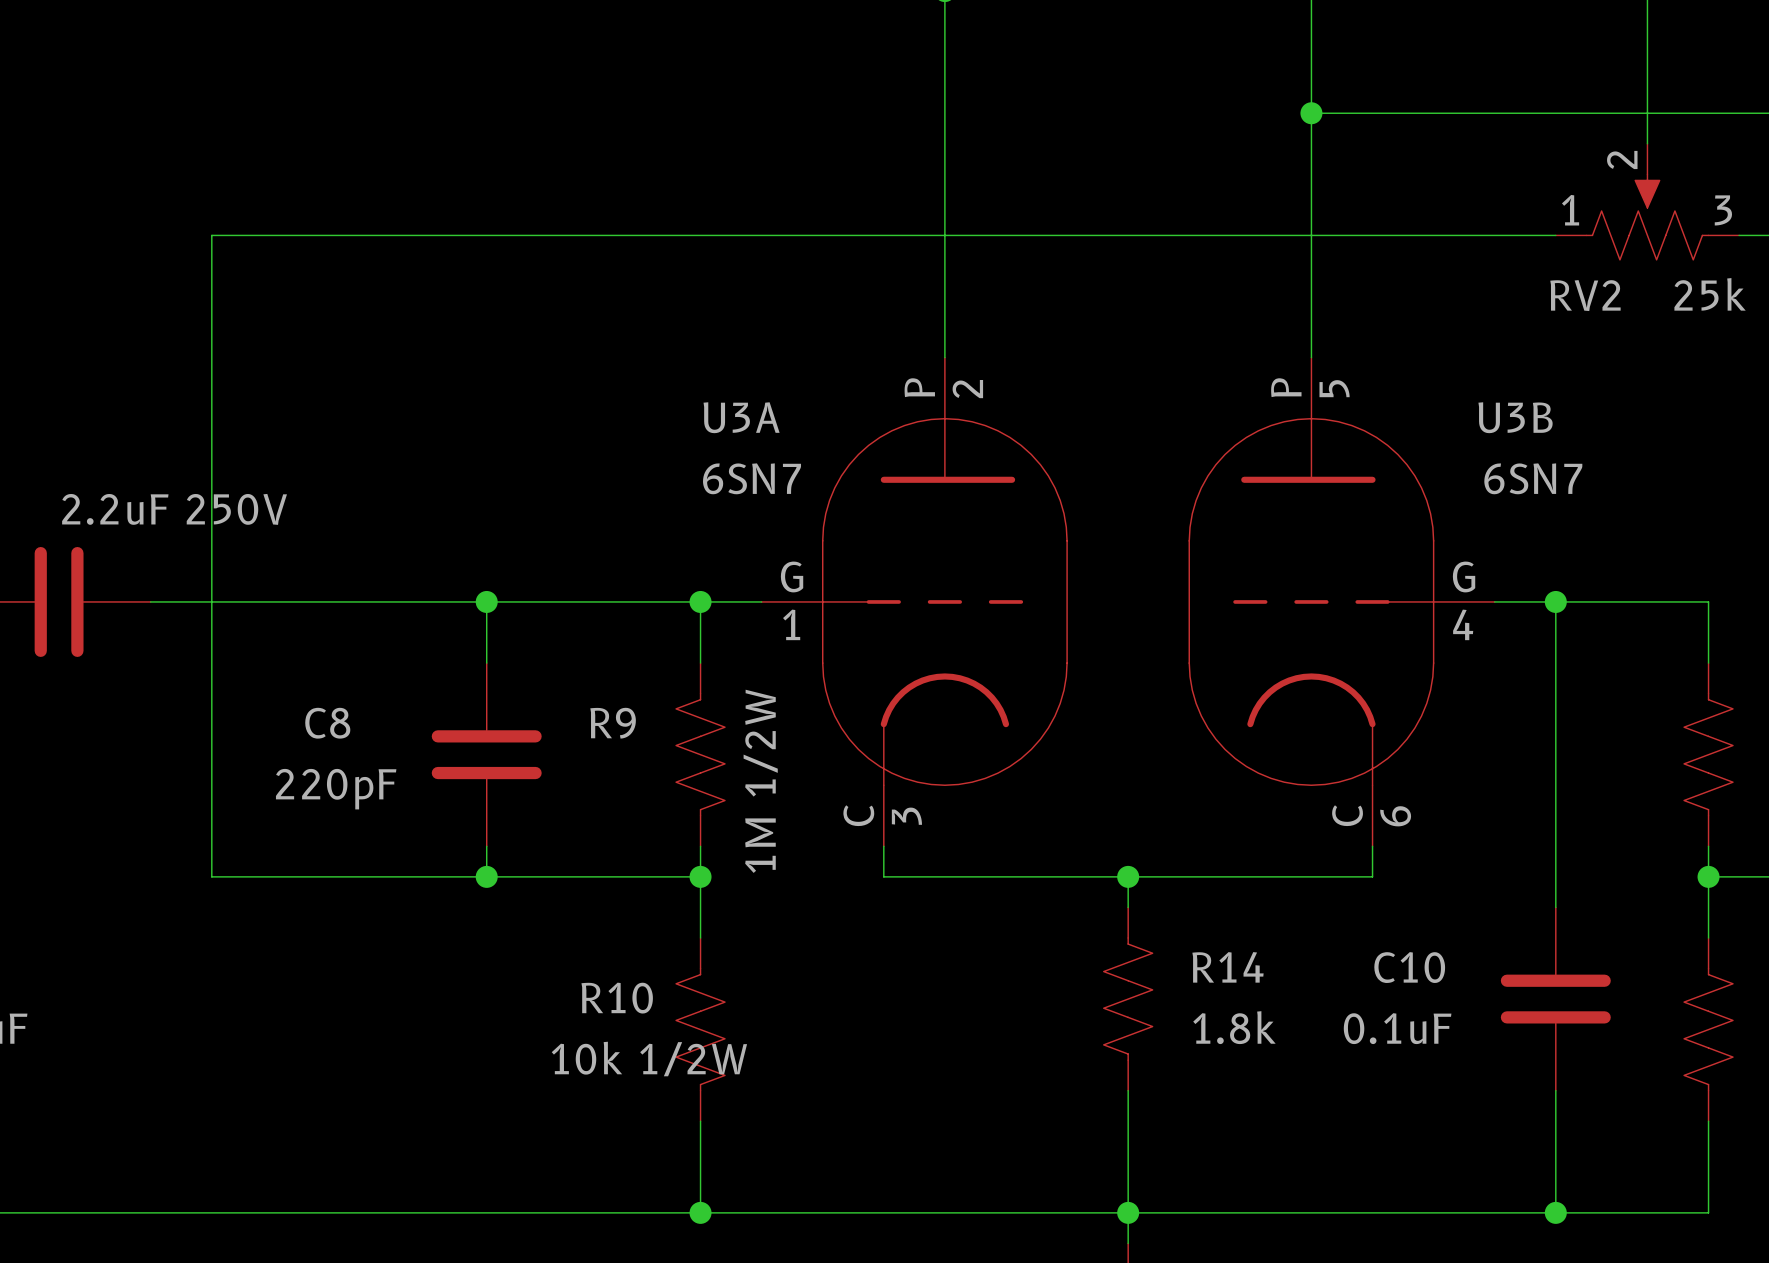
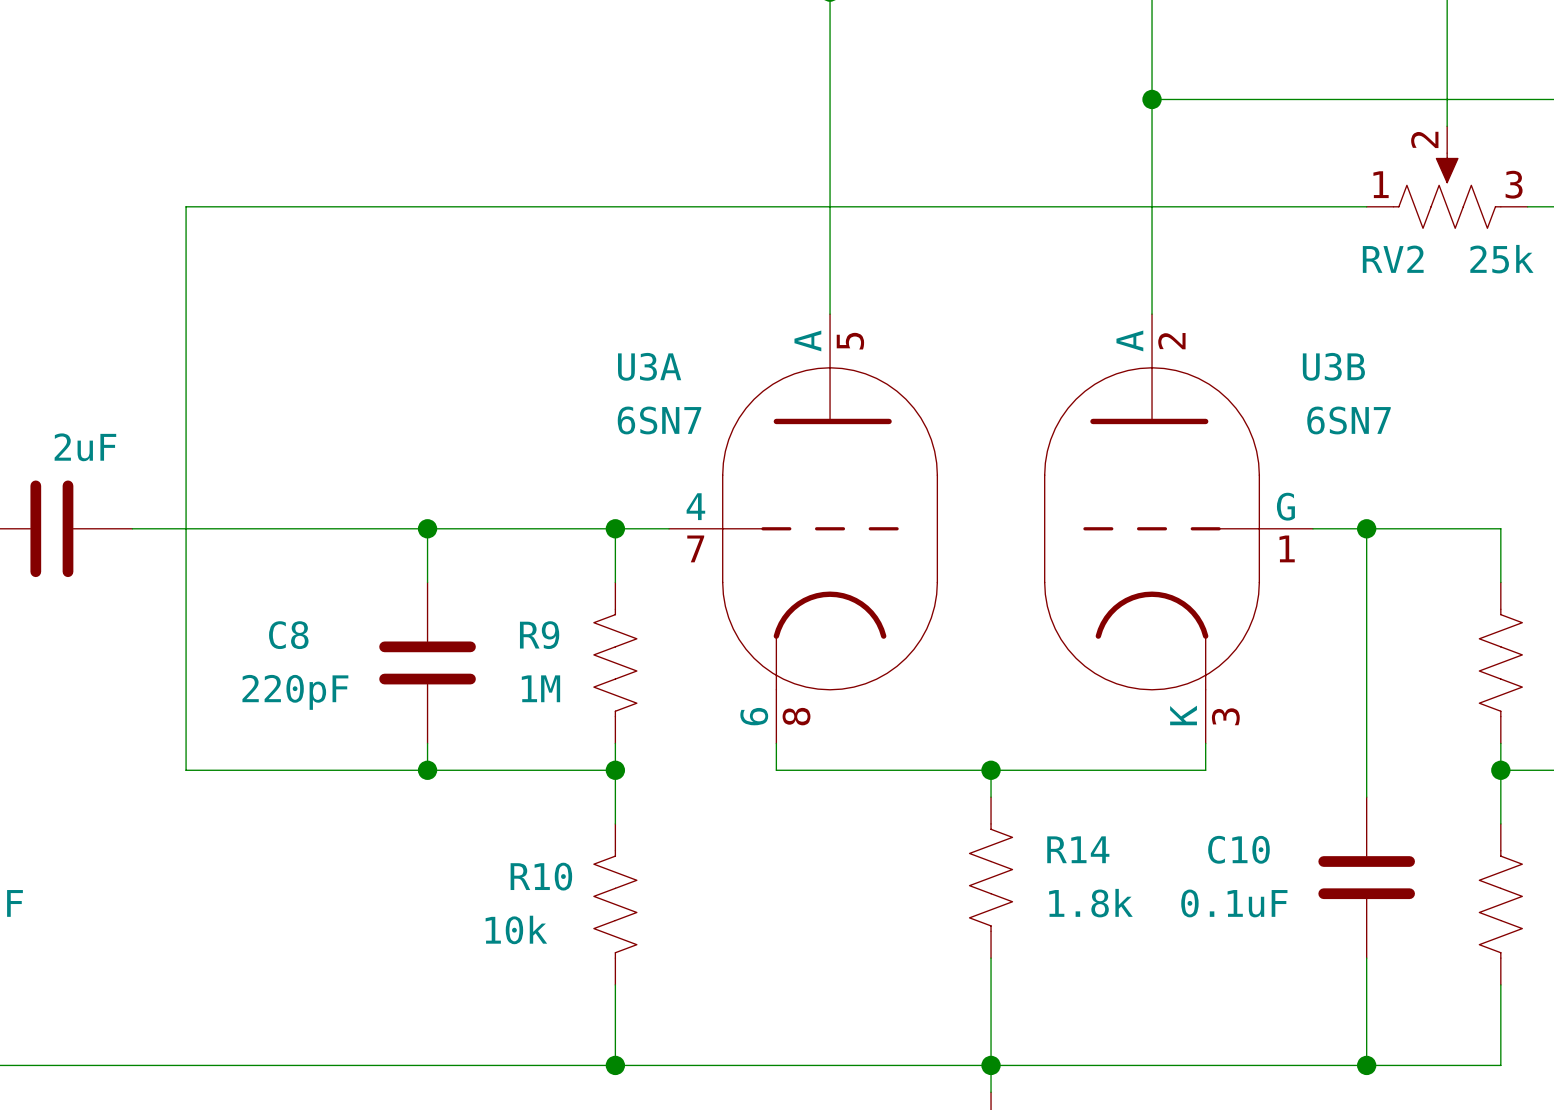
U3A pin name: P (919, 387) -> A (807, 340)
U3B pin name: P (1286, 387) -> A (1129, 340)
U3B pin number: 5 (1334, 388) -> 2 (1171, 341)
U3A pin number: 2 (967, 389) -> 5 (850, 341)
part value: 2.2uF 250V (174, 509) -> 2uF (85, 447)
U3A pin name: G (792, 576) -> 4 (695, 506)
U3A pin number: 1 (791, 624) -> 7 (695, 548)
U3B pin number: 4 (1463, 624) -> 1 (1287, 548)
R9 value: 1M 1/2W (760, 781) -> 1M (540, 688)
U3A pin name: C (858, 815) -> 6 (754, 716)
U3B pin name: C (1347, 815) -> K (1183, 715)
U3A pin number: 3 (906, 816) -> 8 (796, 716)
U3B pin number: 6 (1395, 816) -> 3 (1225, 716)
R10 value: 10k 1/2W (649, 1059) -> 10k (516, 929)

